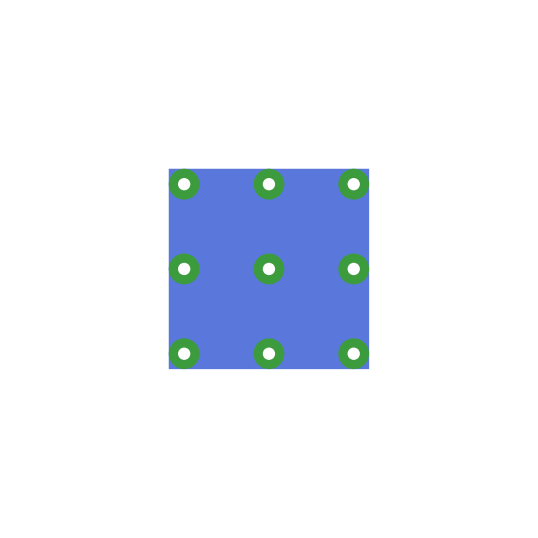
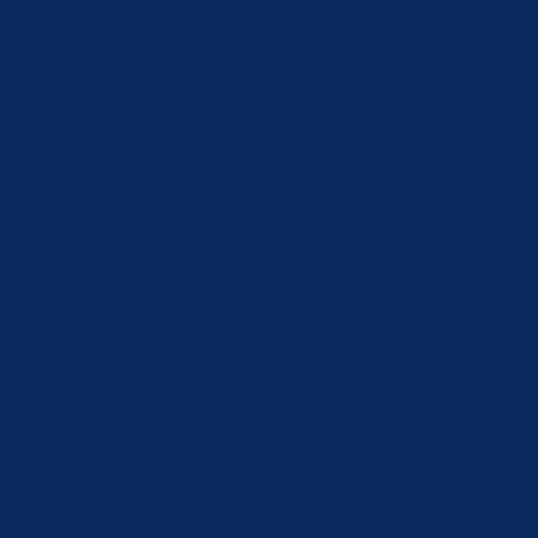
part: (268, 268) -> none

